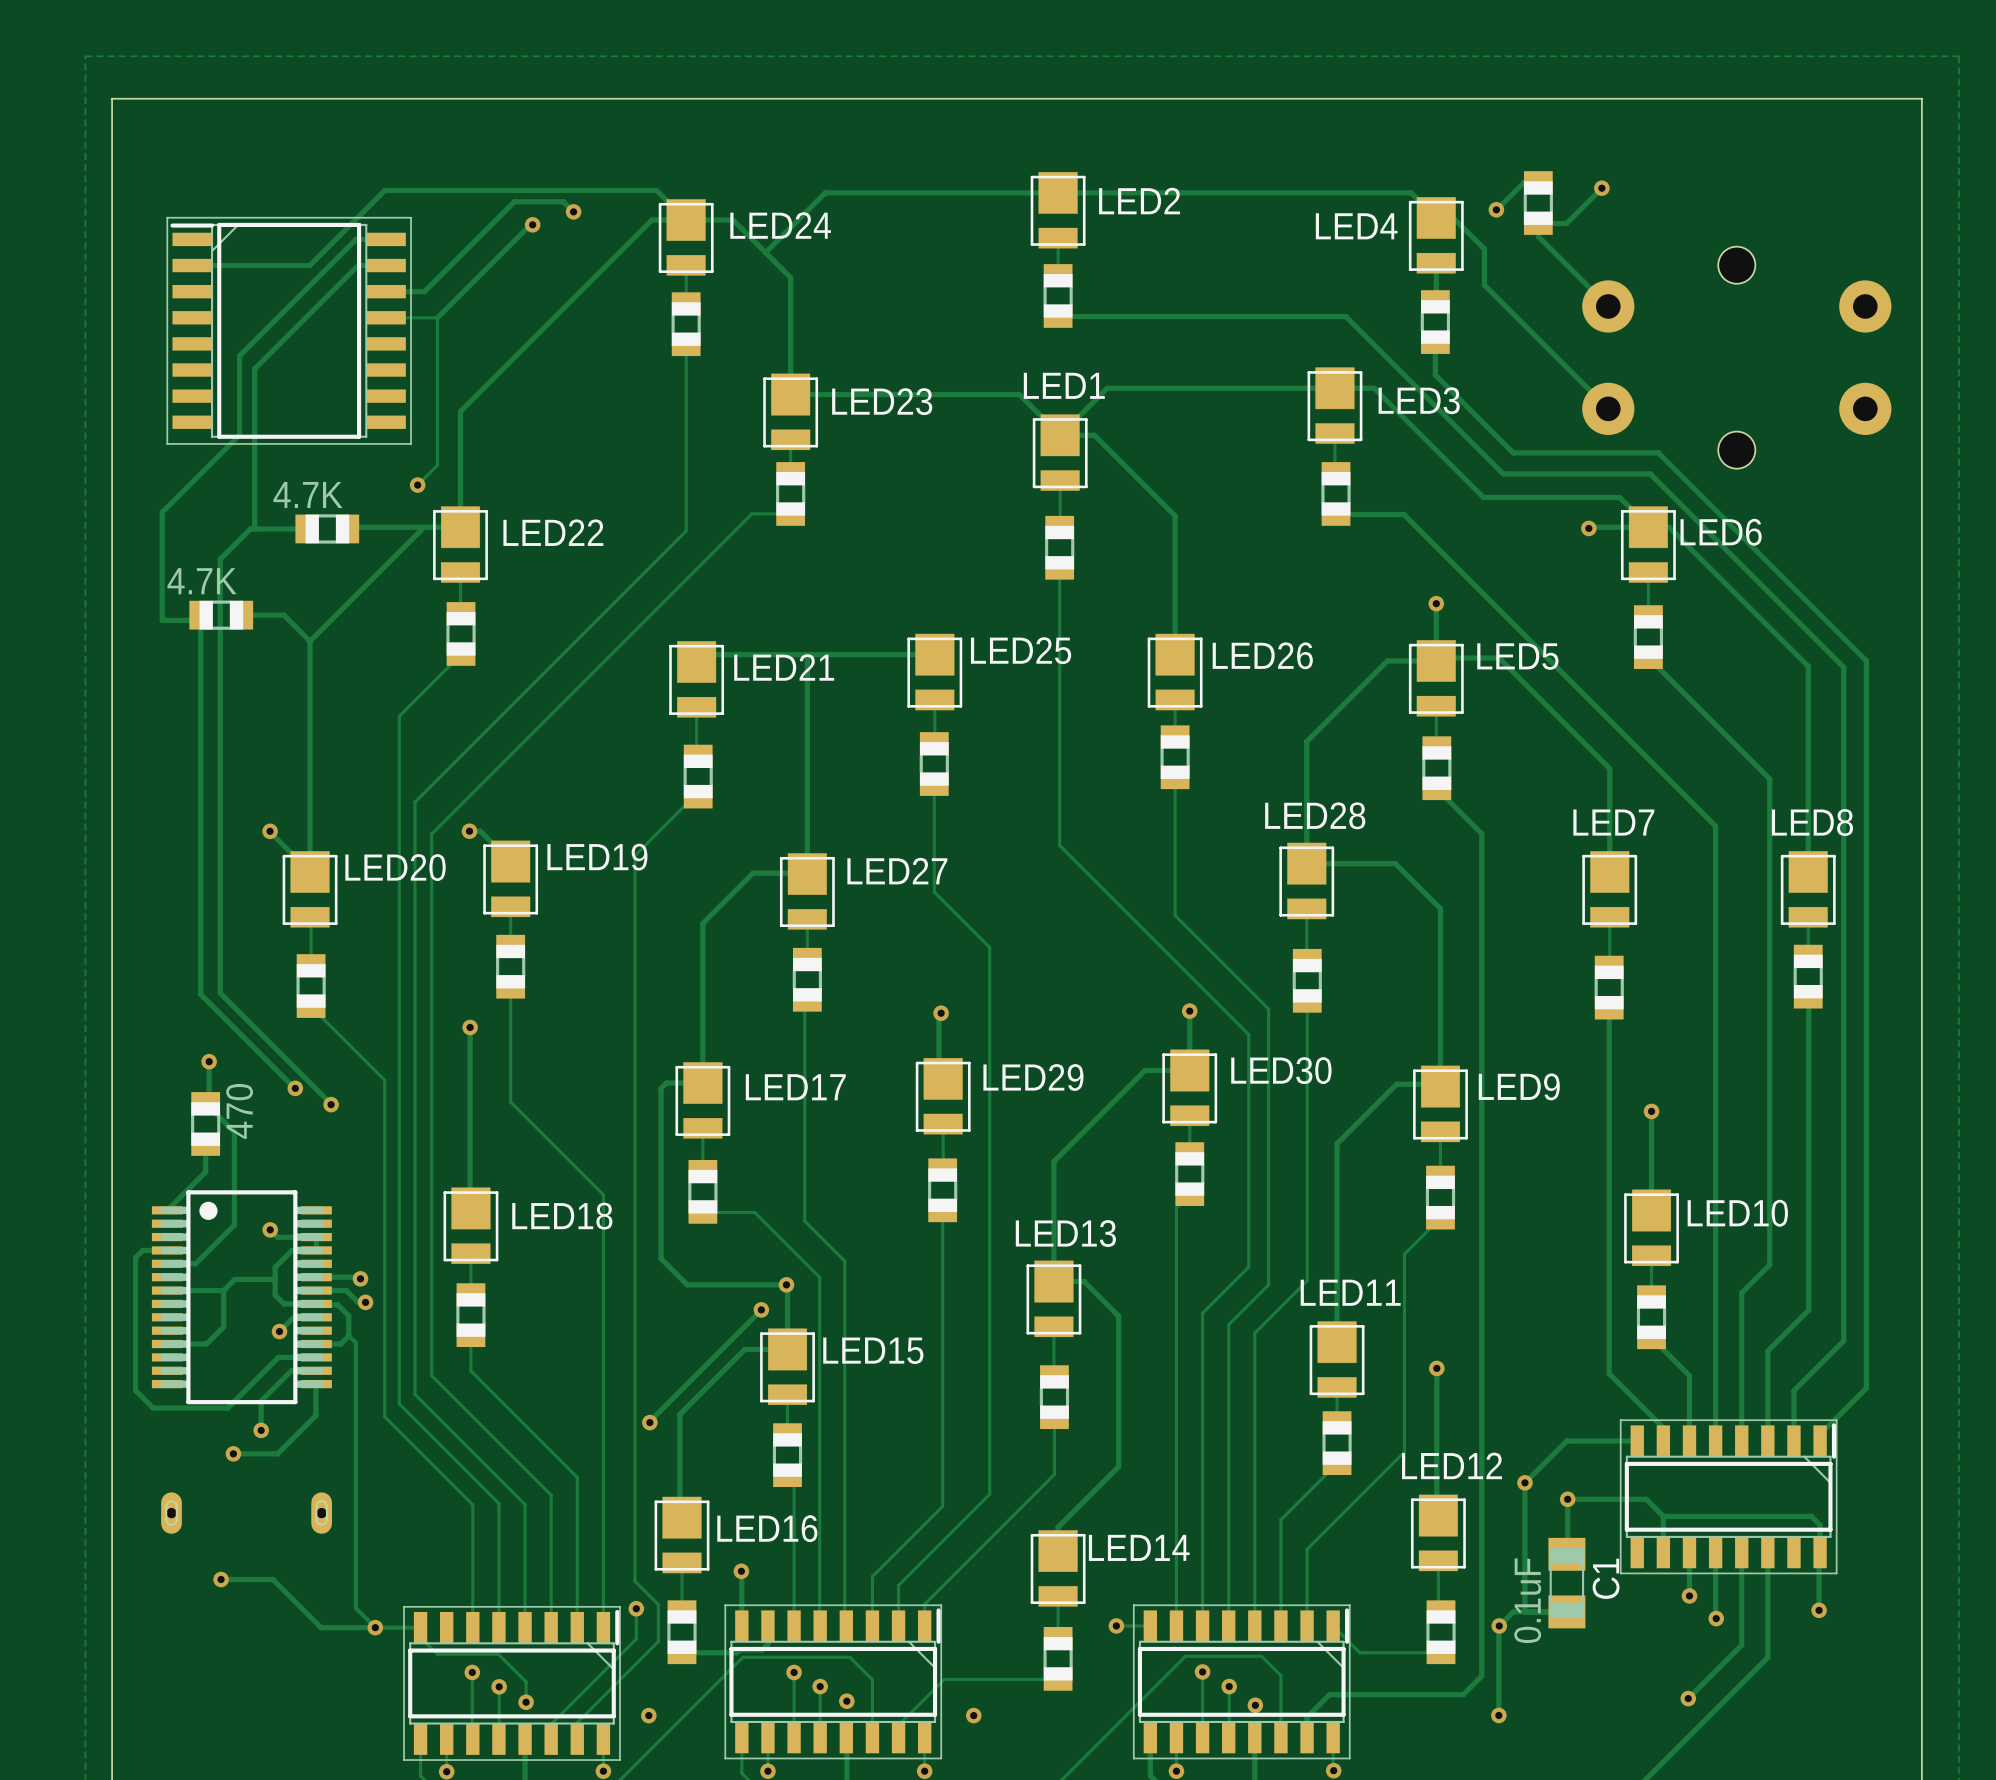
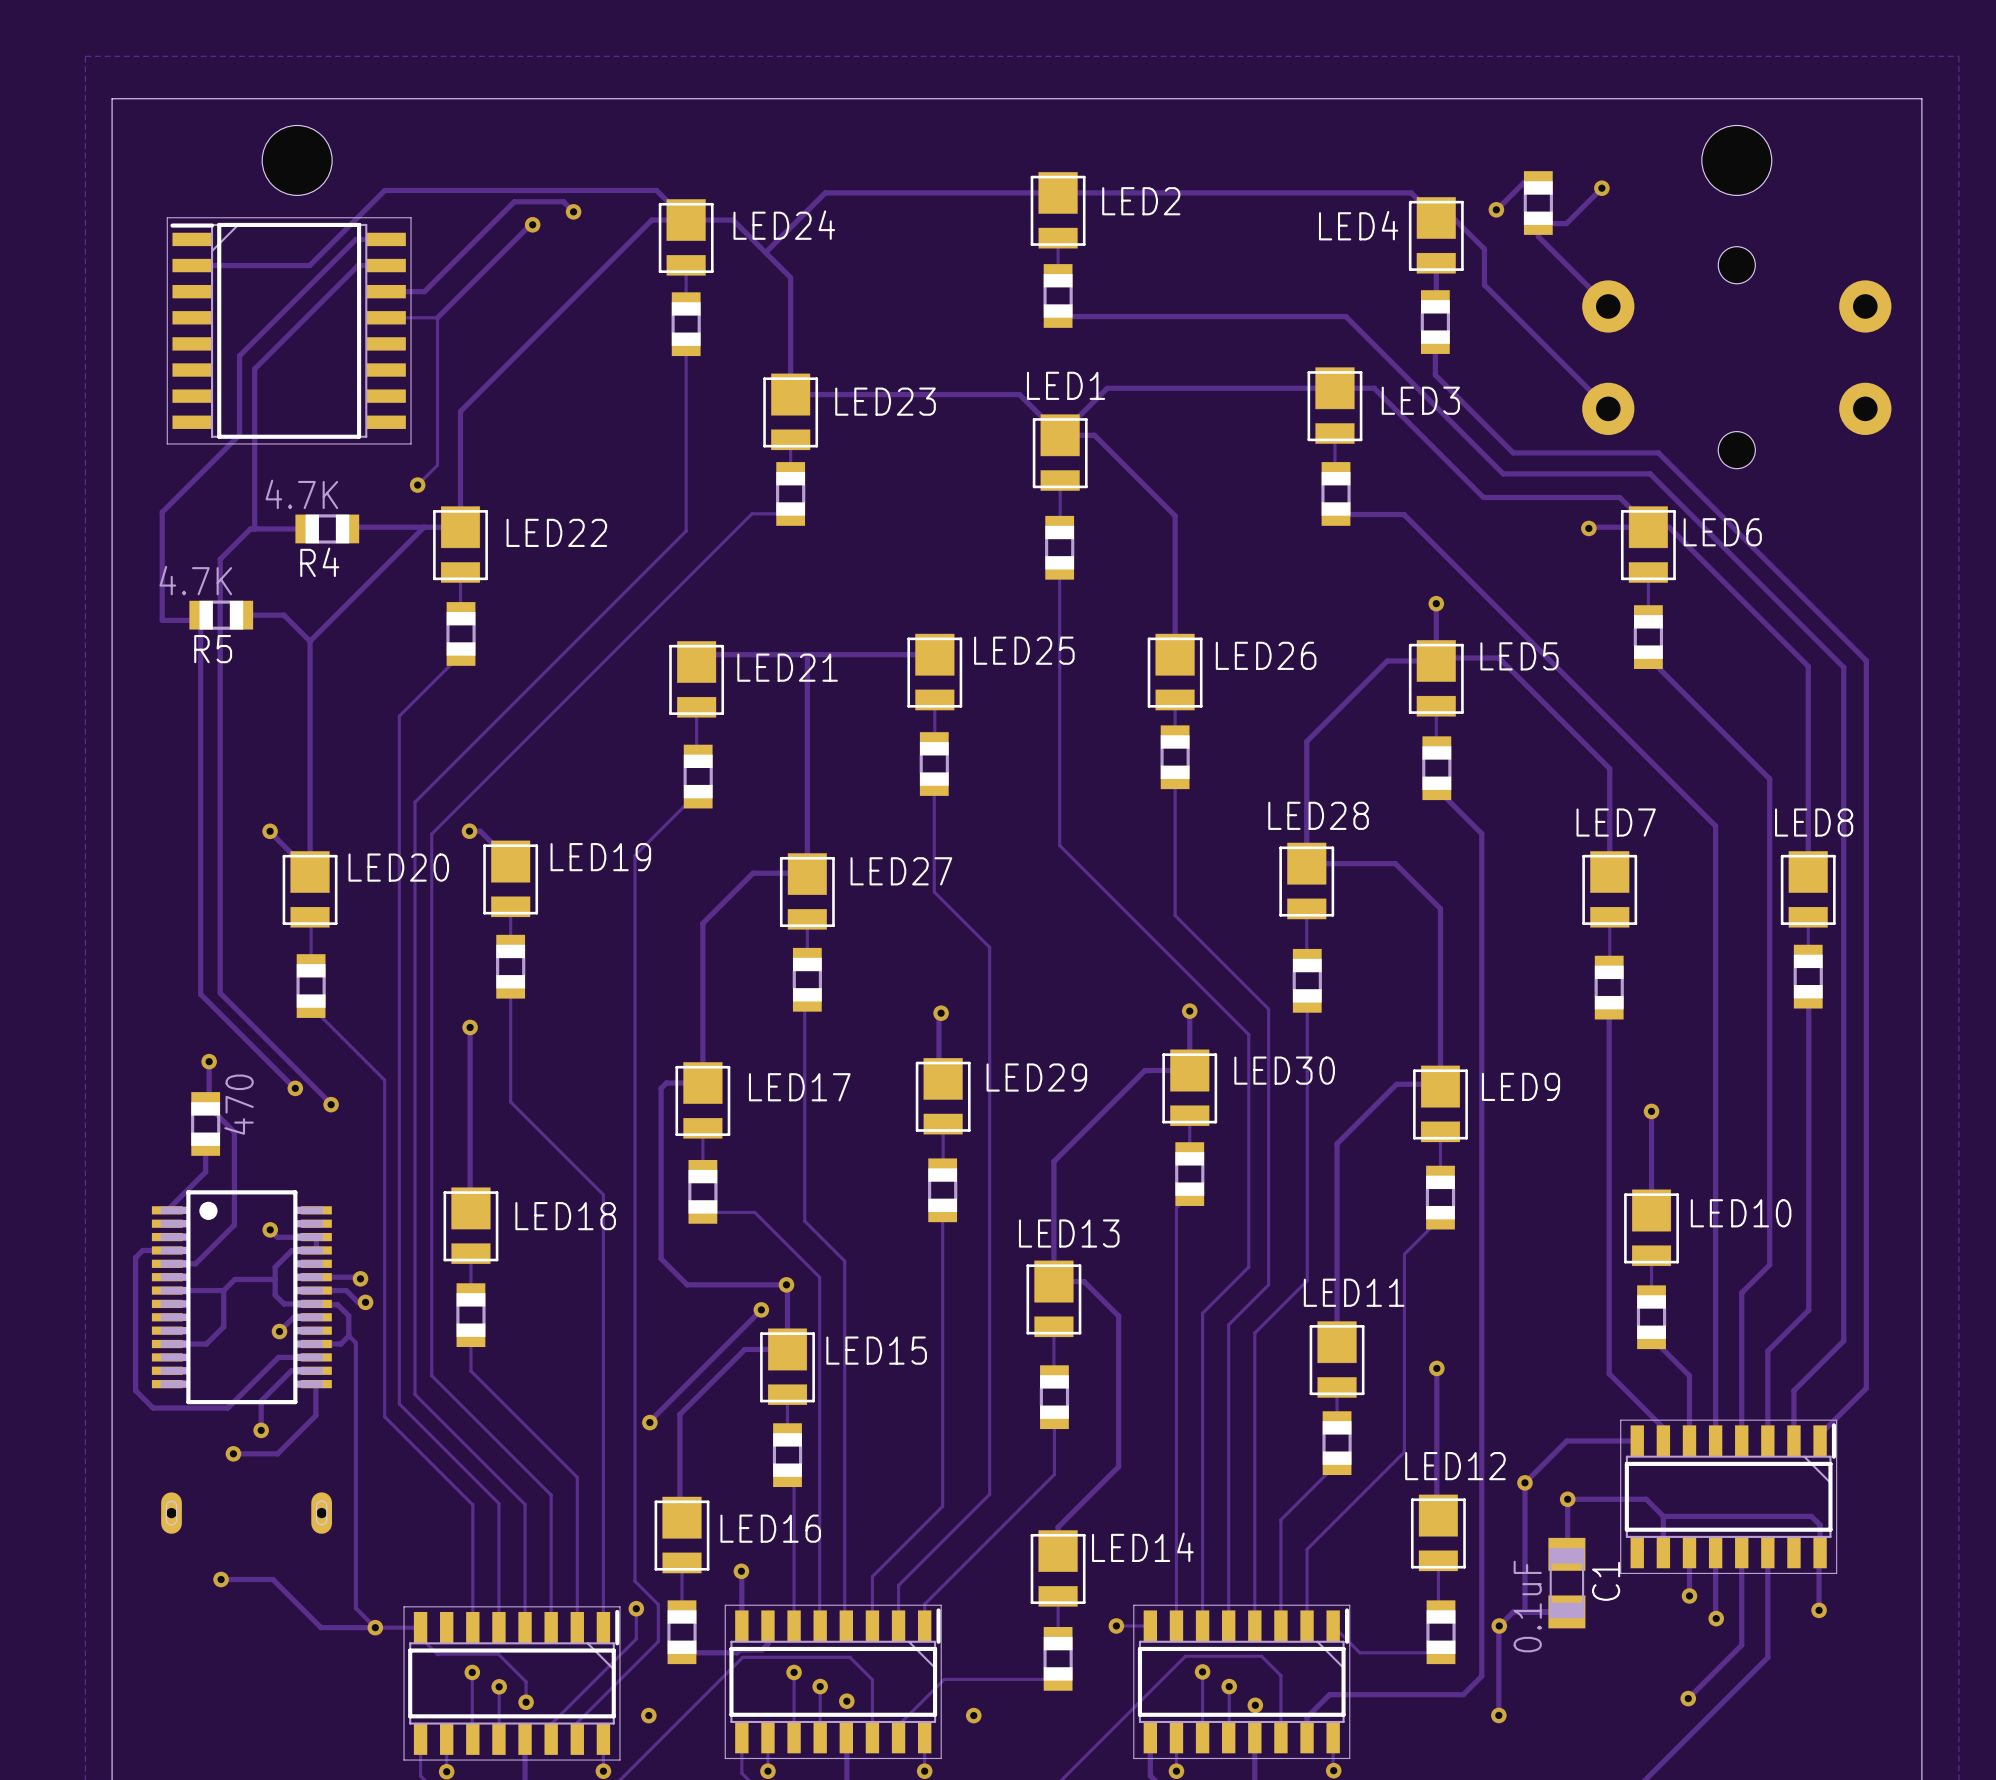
part: none -> (297, 160)
part: none -> (1736, 160)
R4 name: none -> R4 (319, 562)
R5 name: none -> R5 (213, 649)

